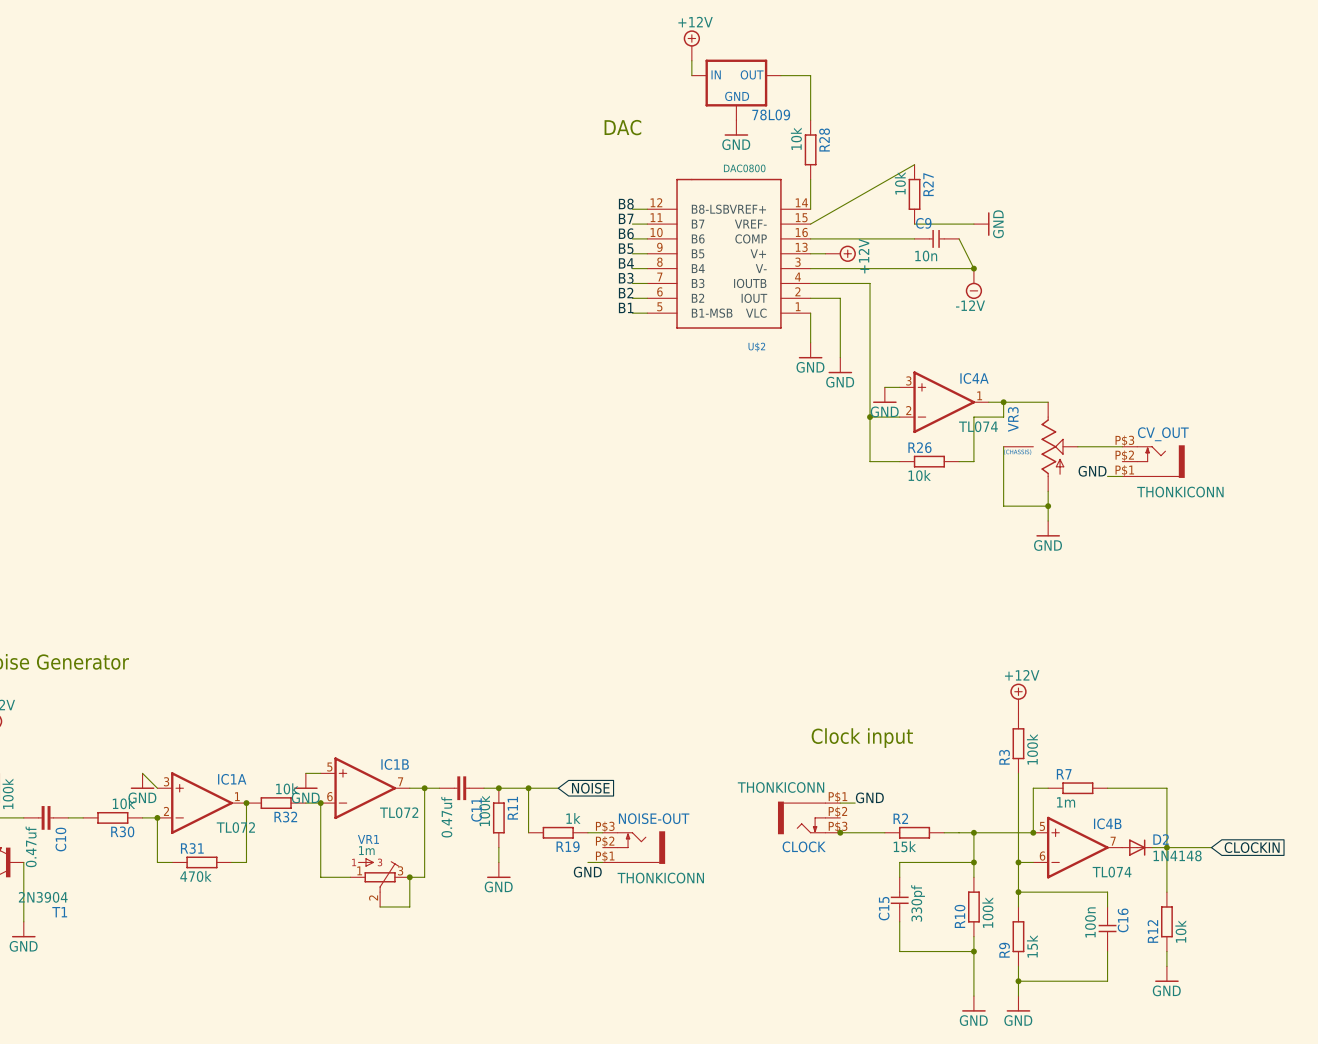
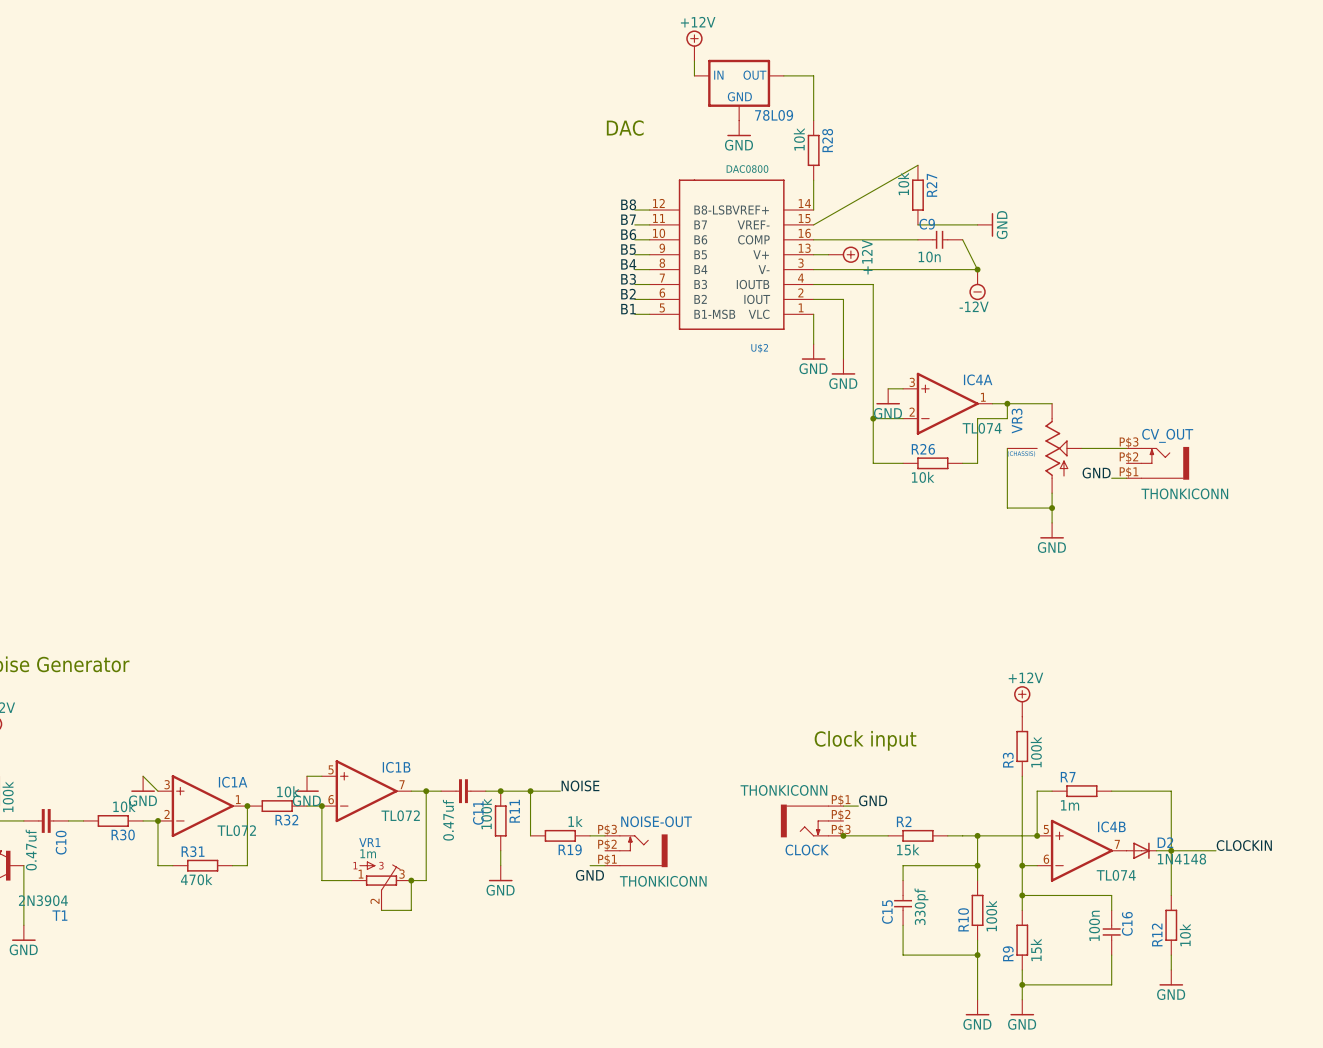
label: none -> NOISE (580, 785)
global label: NOISE (590, 788) -> none
label: none -> CLOCKIN (1244, 845)
global label: CLOCKIN (1252, 847) -> none

